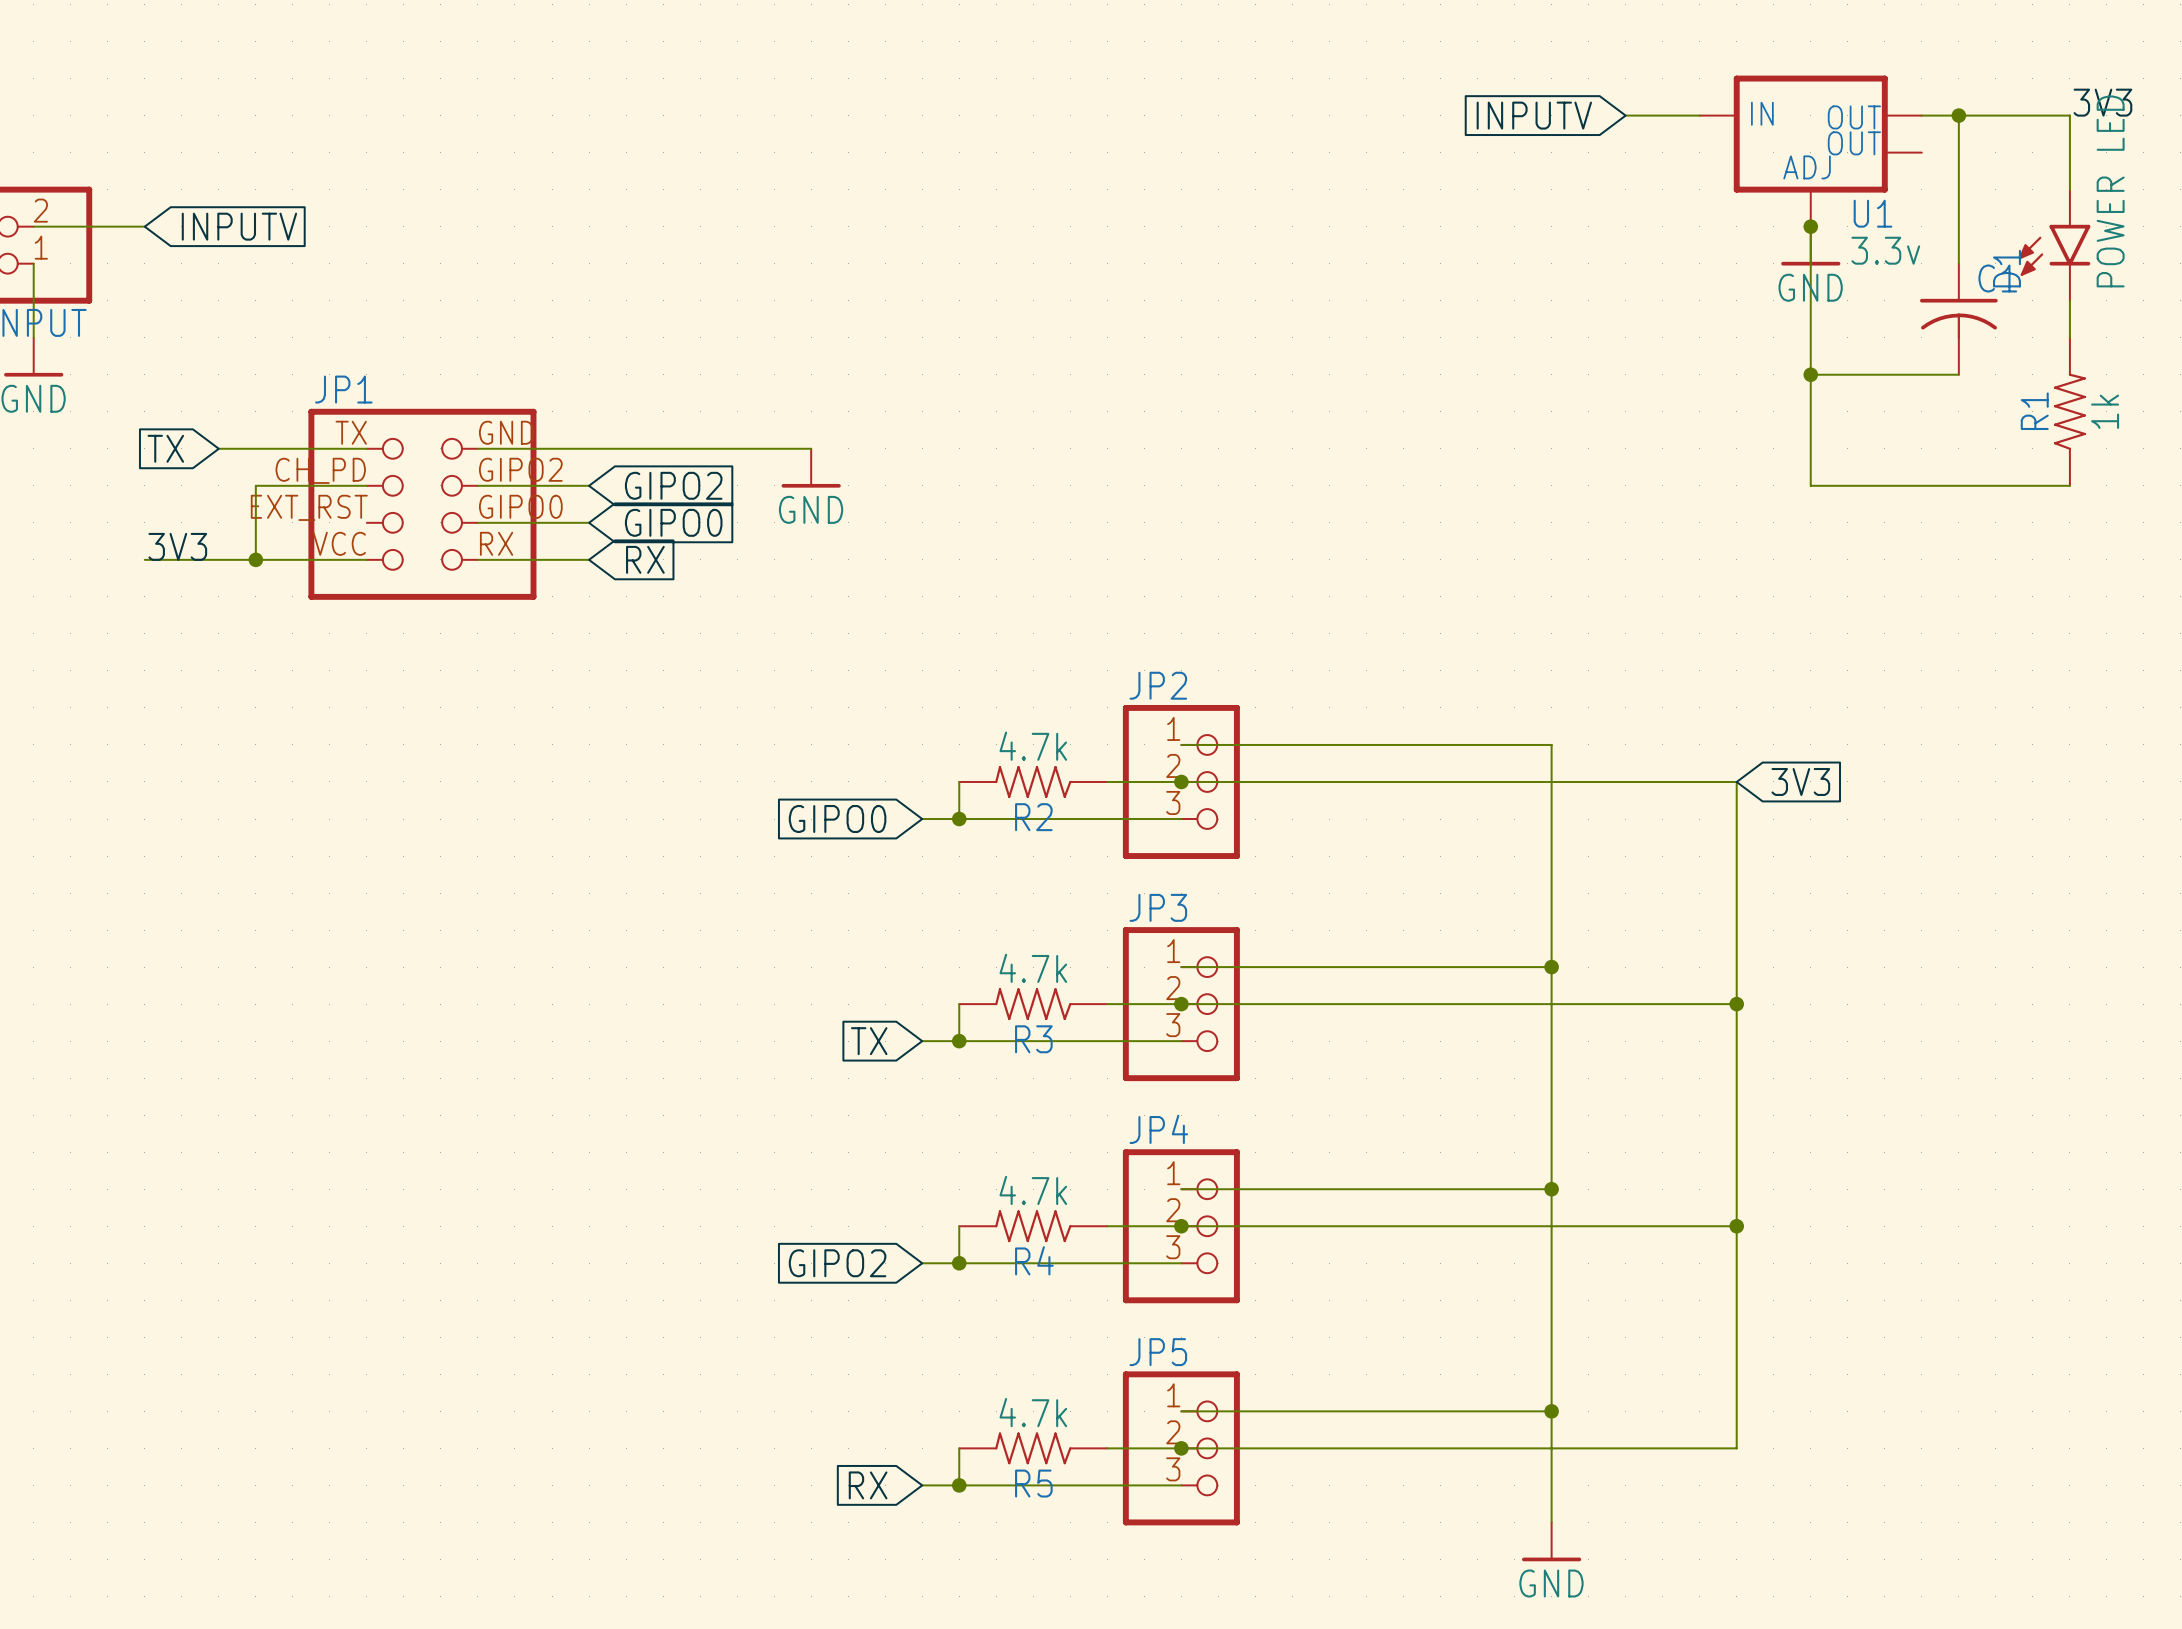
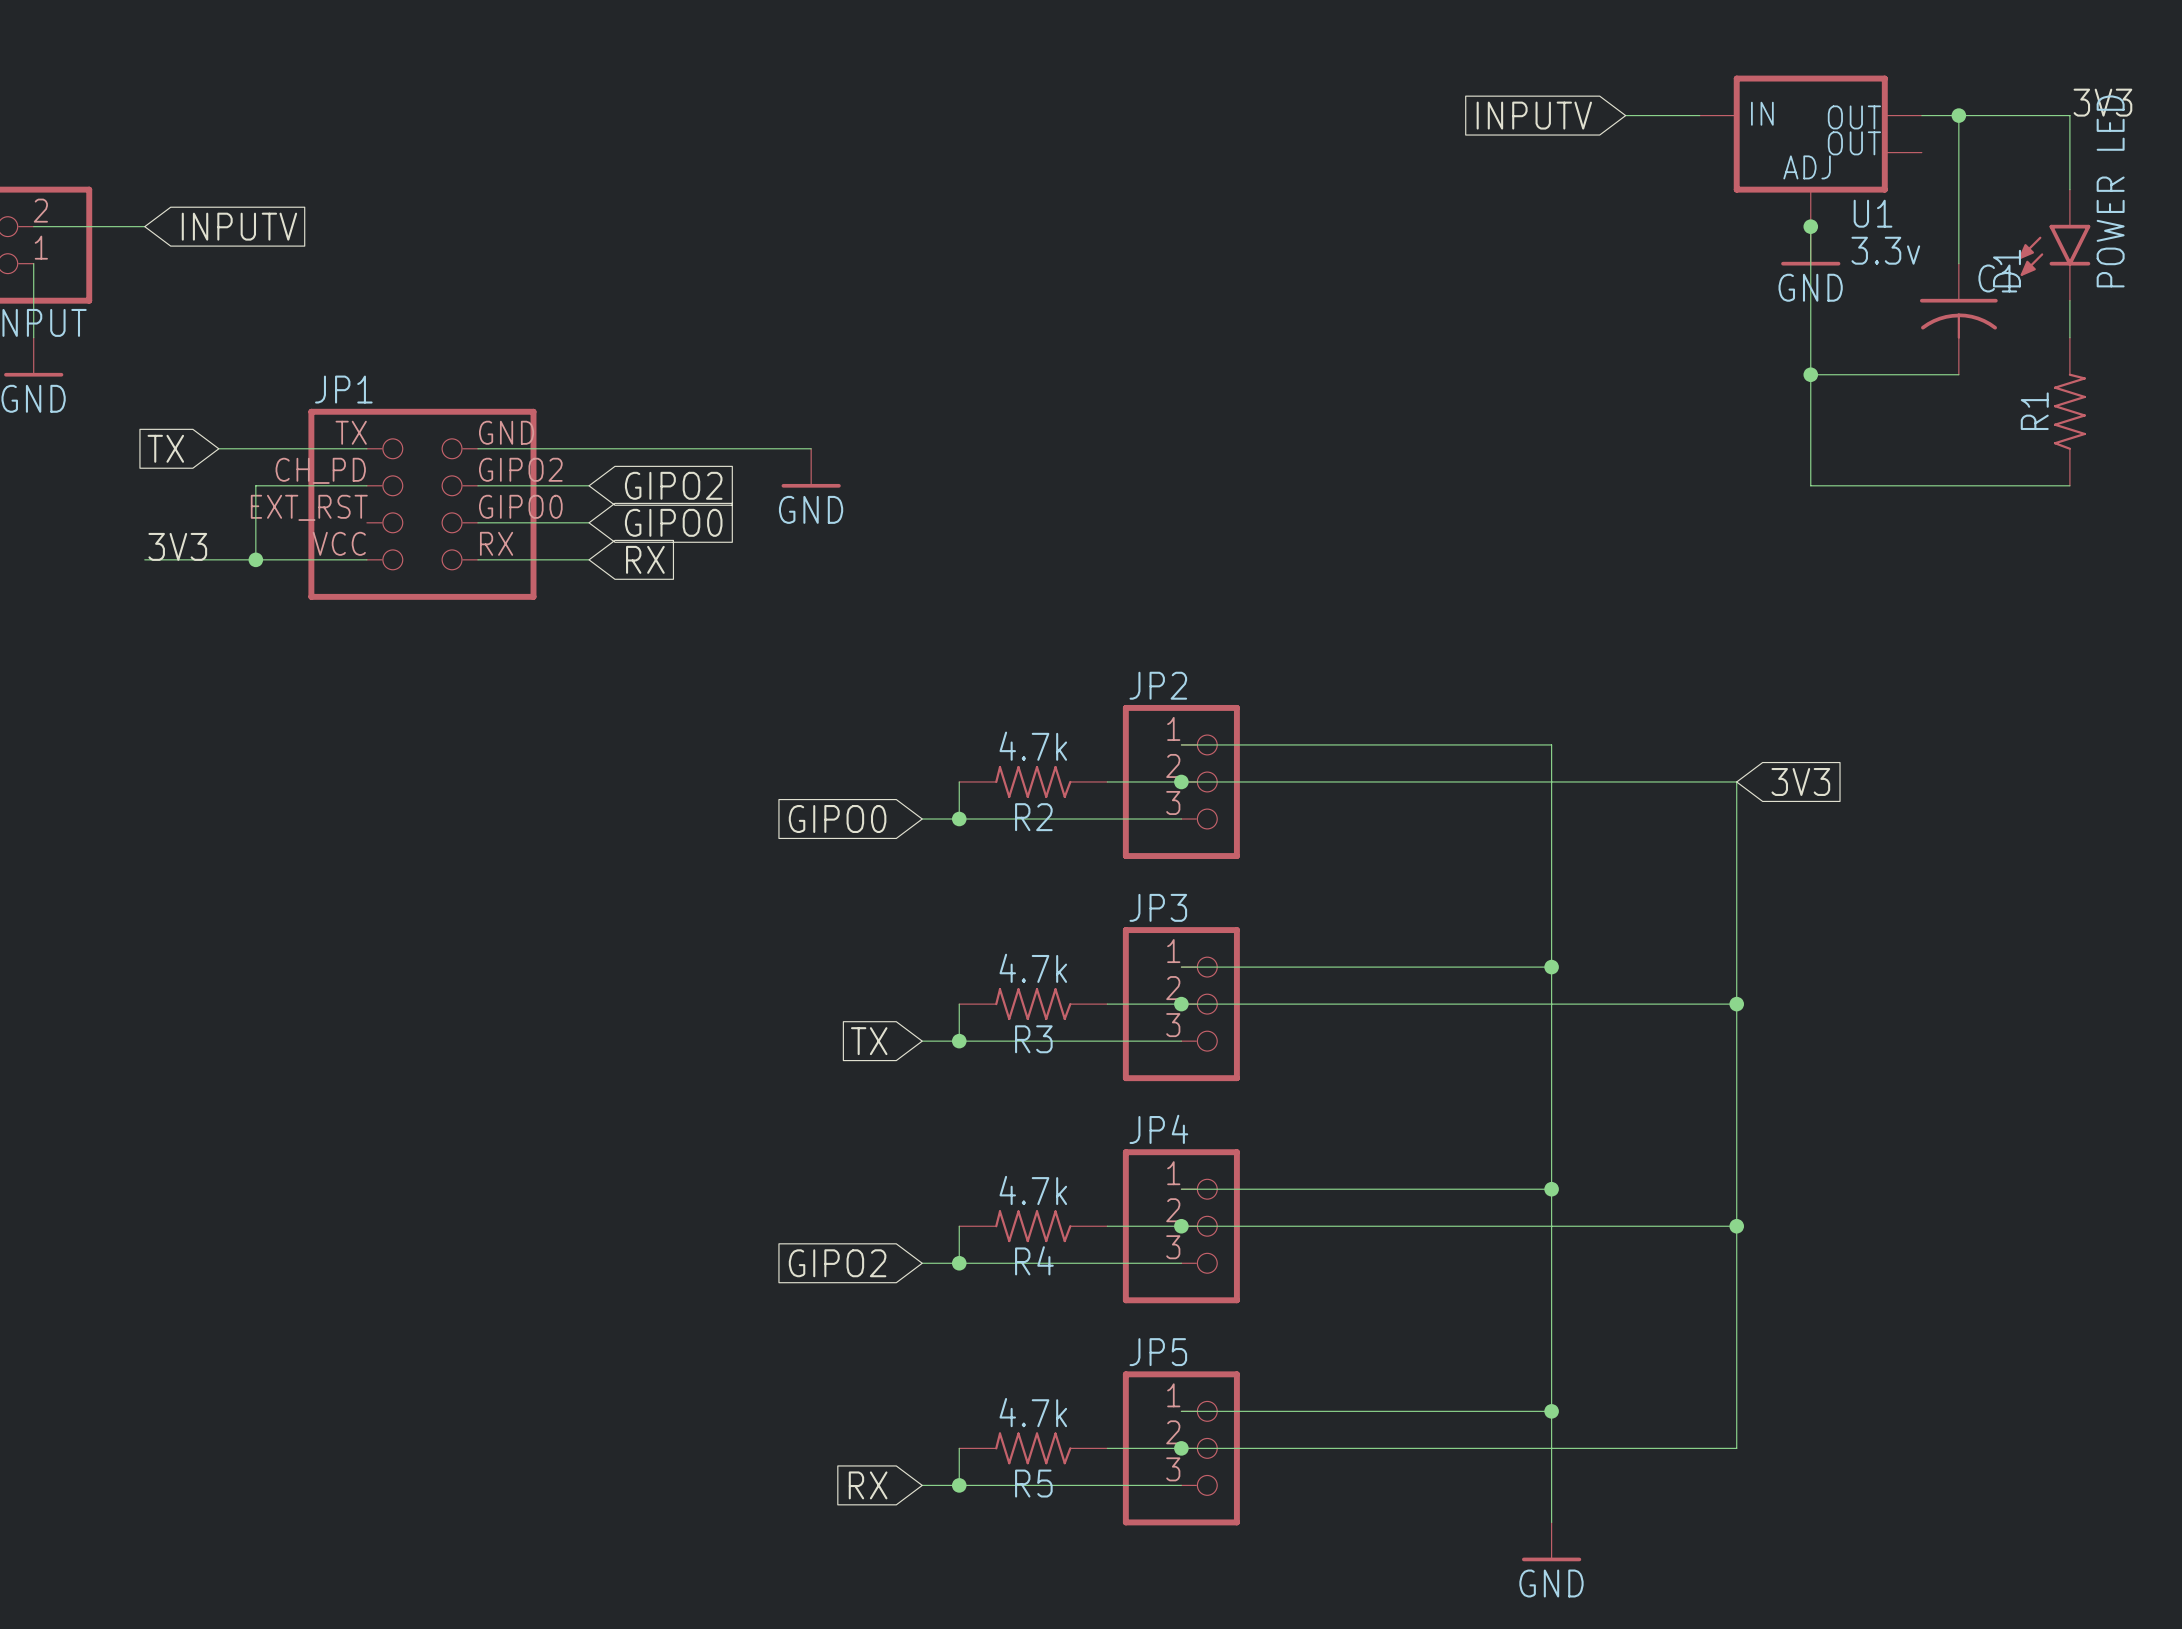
R1 value: 1k (2105, 411) -> none

